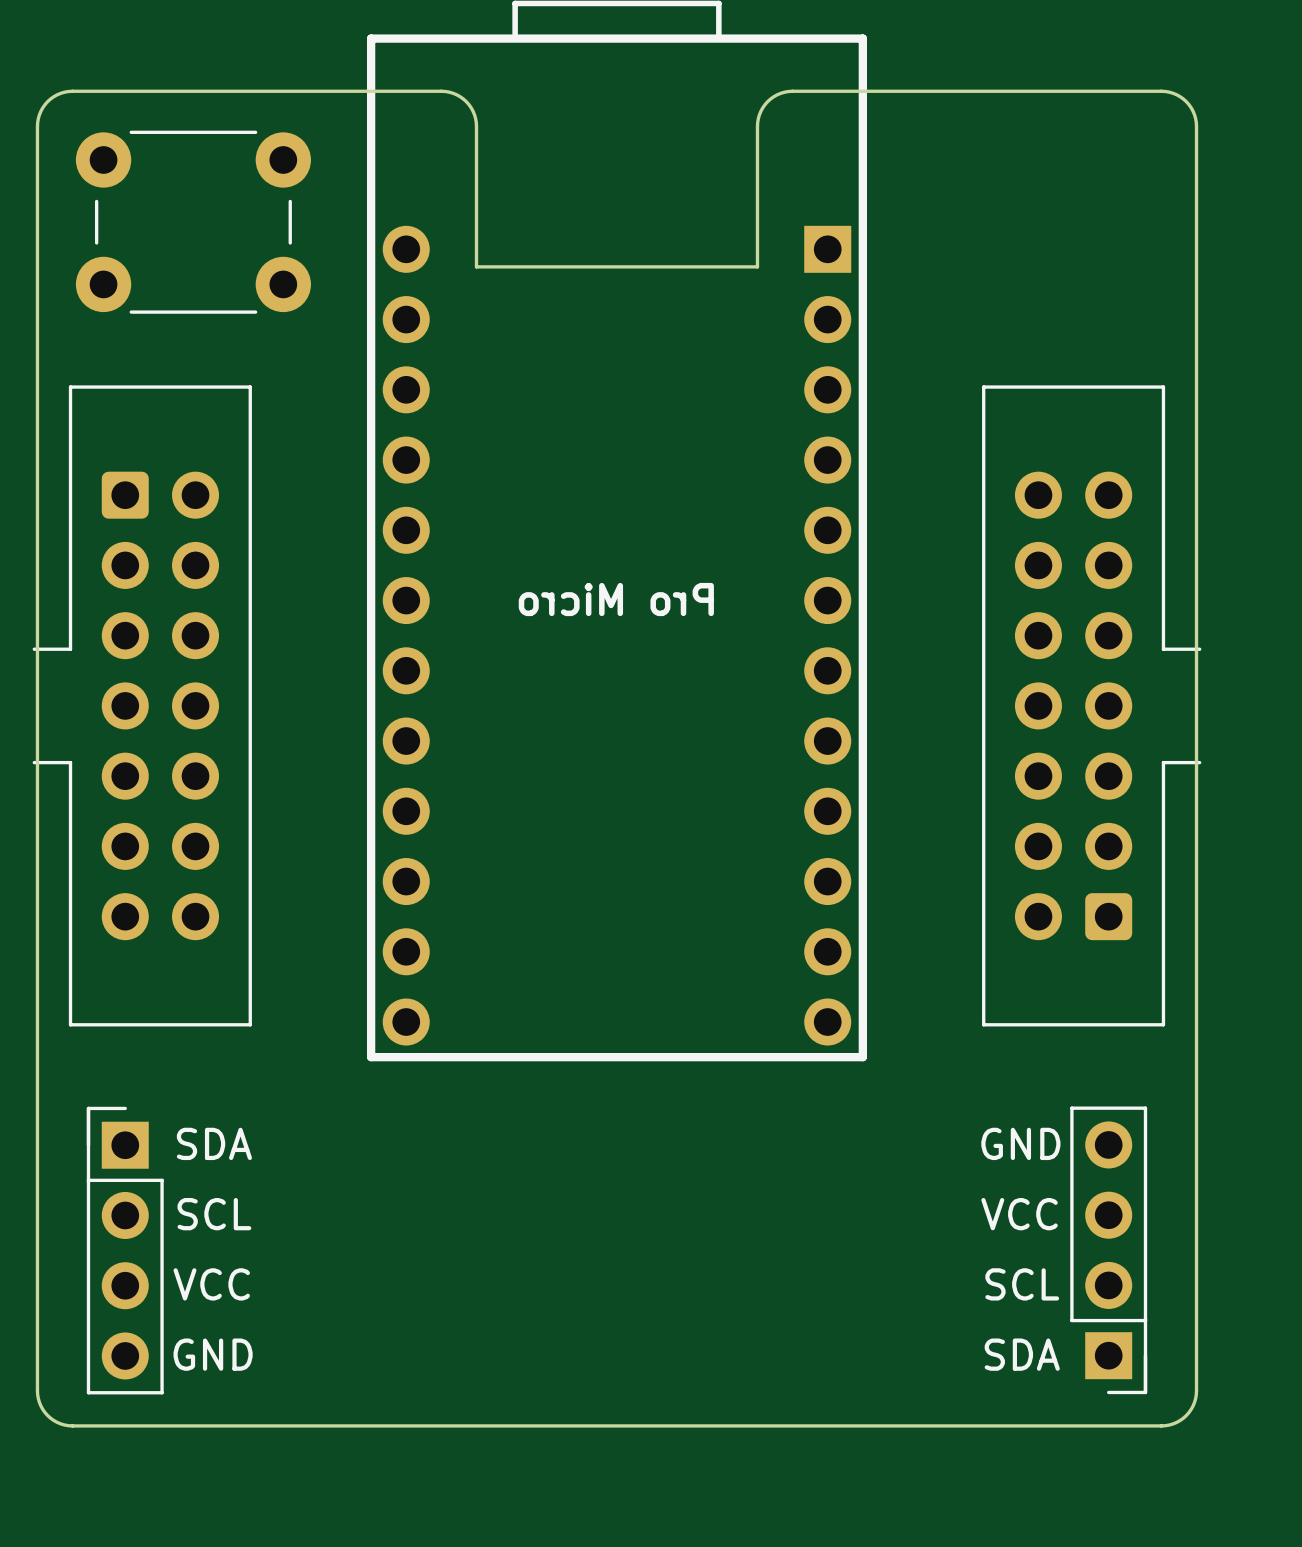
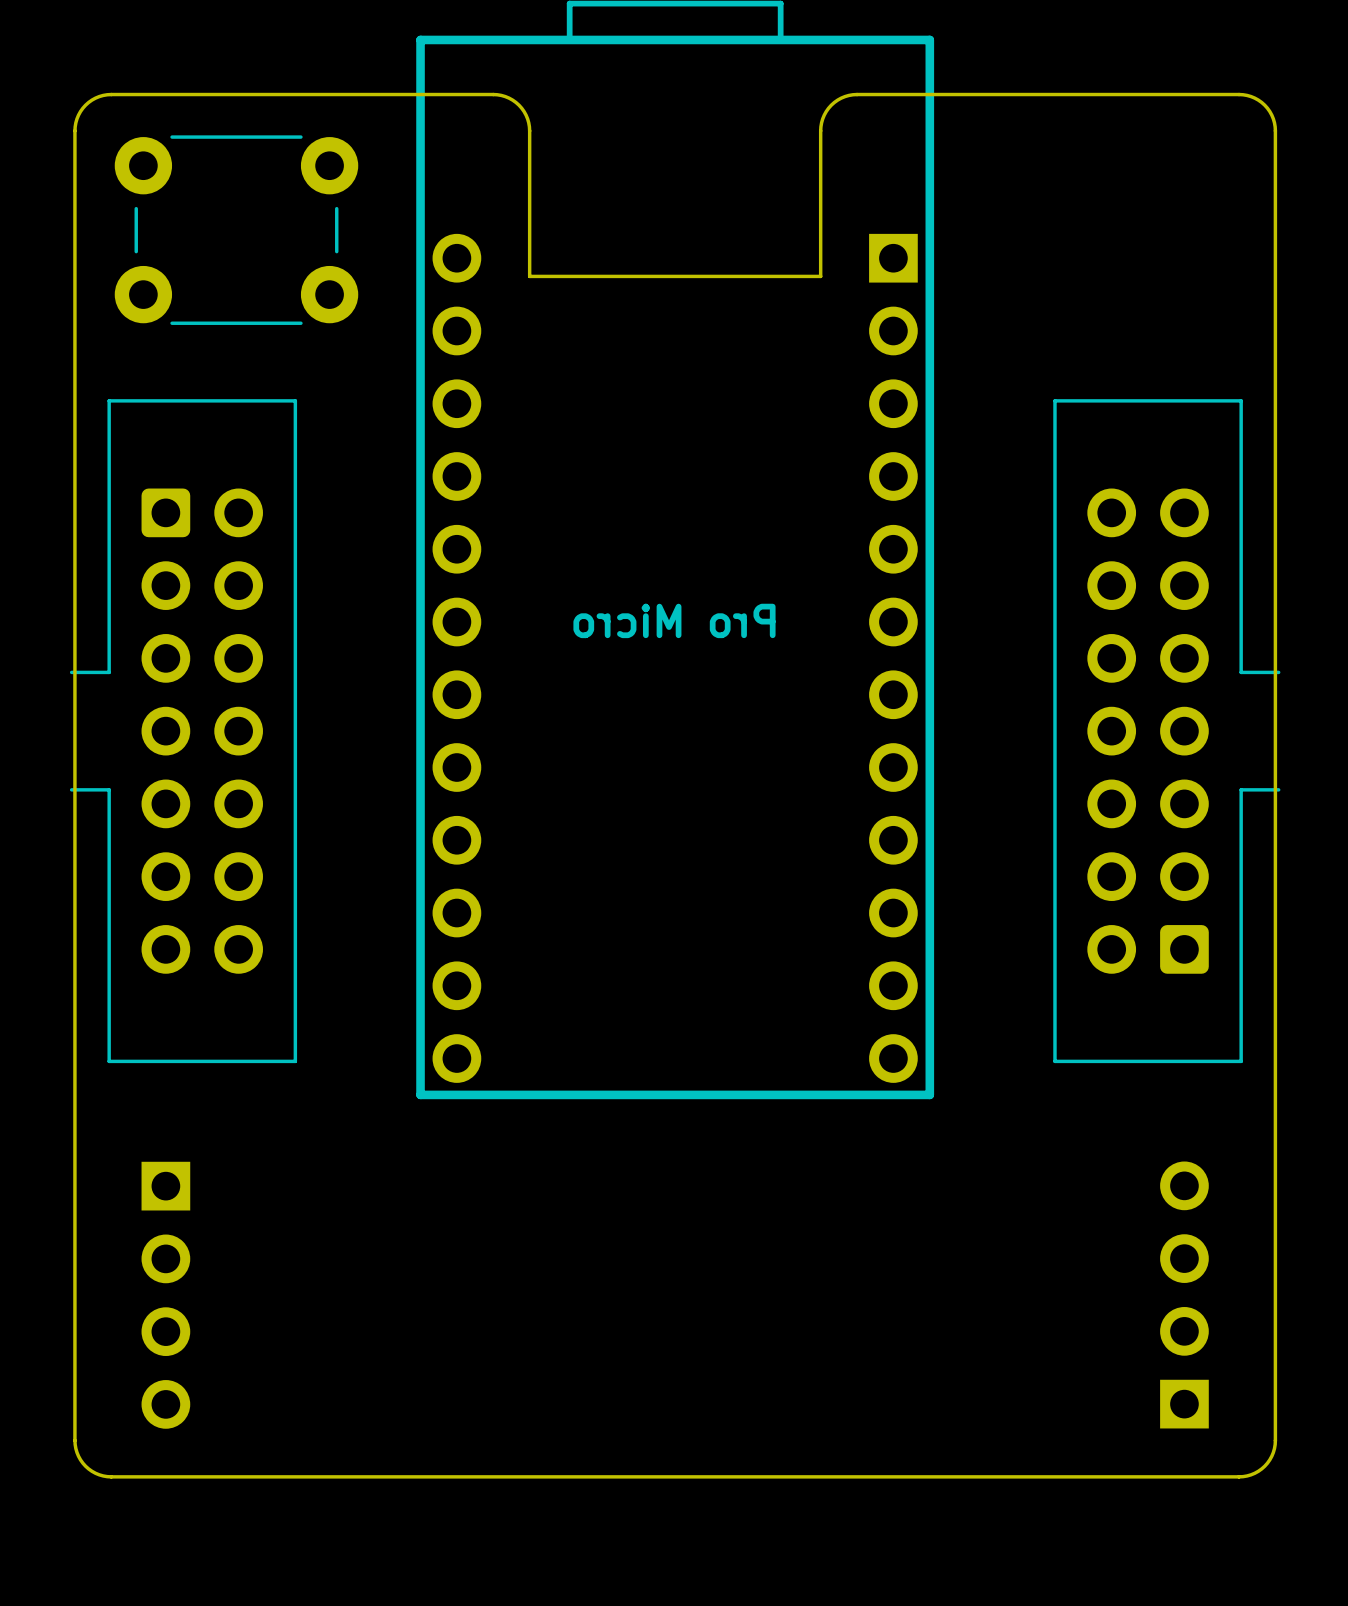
part footprint: [86, 1106, 164, 1395] -> [141, 1161, 191, 1429]
part footprint: [1070, 1106, 1148, 1395] -> [1160, 1161, 1209, 1429]
text: SDA (214, 1143) -> none
text: GND (1020, 1143) -> none
text: SCL (214, 1214) -> none
text: VCC (1019, 1214) -> none
text: VCC (211, 1284) -> none
text: SCL (1022, 1284) -> none
text: GND (213, 1354) -> none
text: SDA (1022, 1354) -> none

